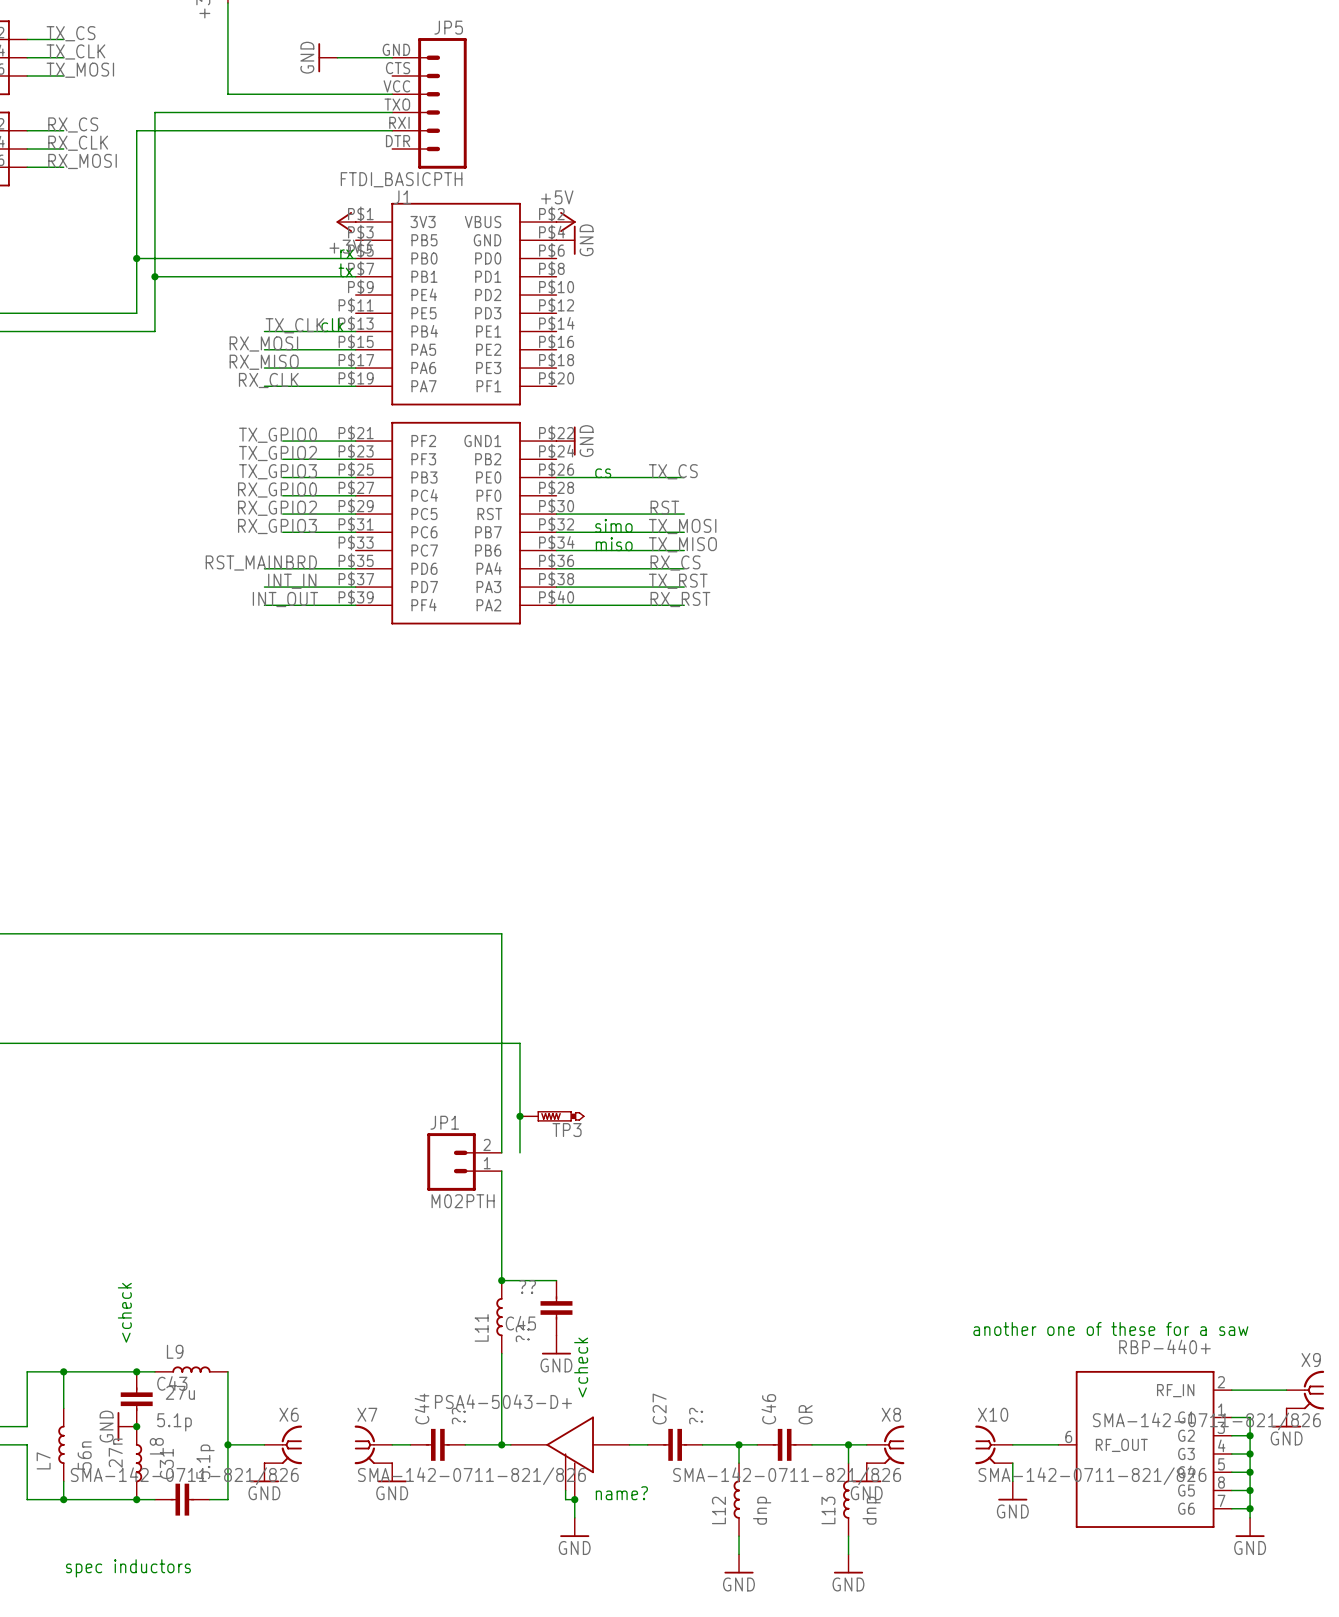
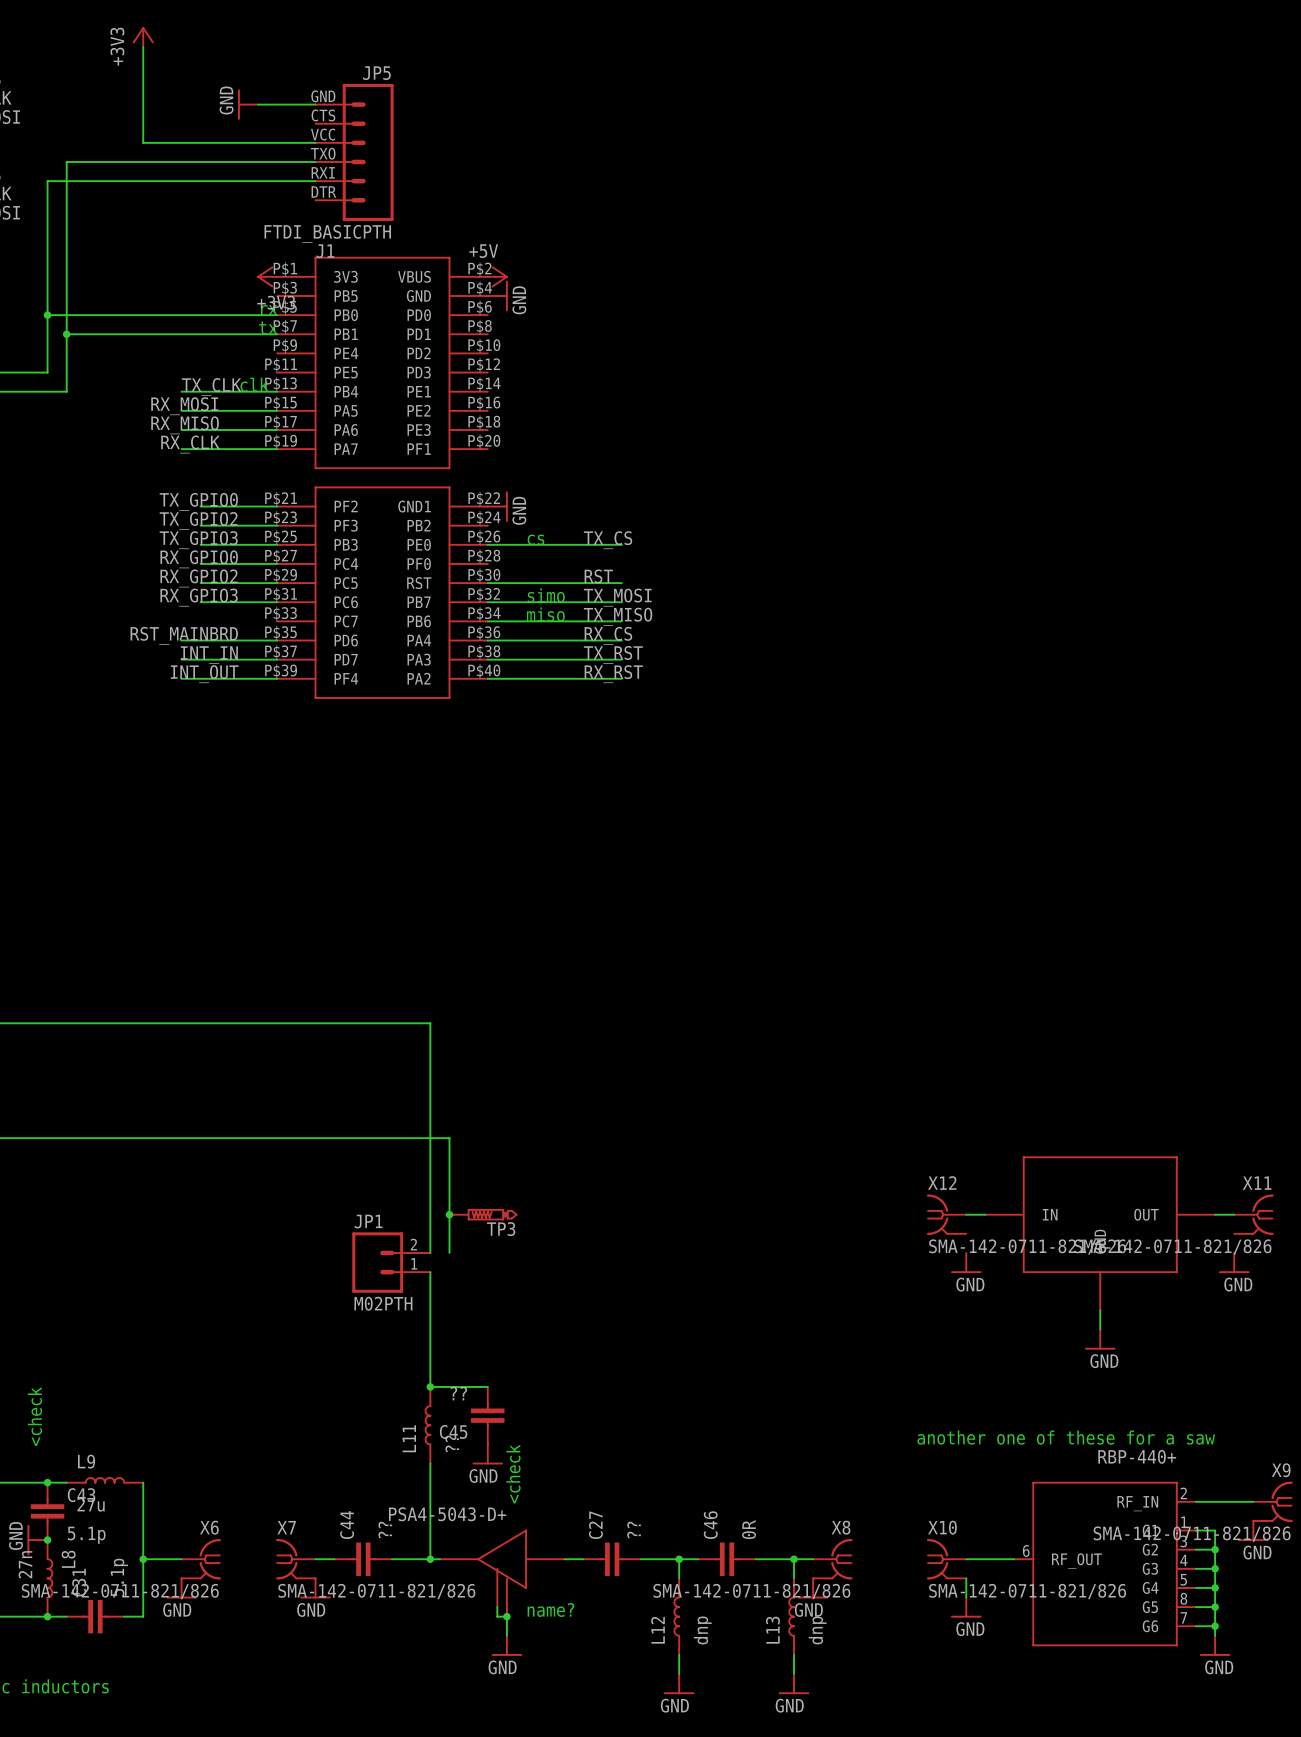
X12: none -> SMA-142-0711-821/826 (946, 1214)
wire: none -> (966, 1214) (985, 1214)
wire: none -> (1215, 1214) (1234, 1214)
X11: none -> SMA-142-0711-821/826 (1253, 1214)
part: none -> (1100, 1233)
power symbol: none -> GND (966, 1263)
power symbol: none -> GND (1234, 1263)
wire: none -> (1100, 1310) (1100, 1329)
power symbol: none -> GND (1100, 1339)

